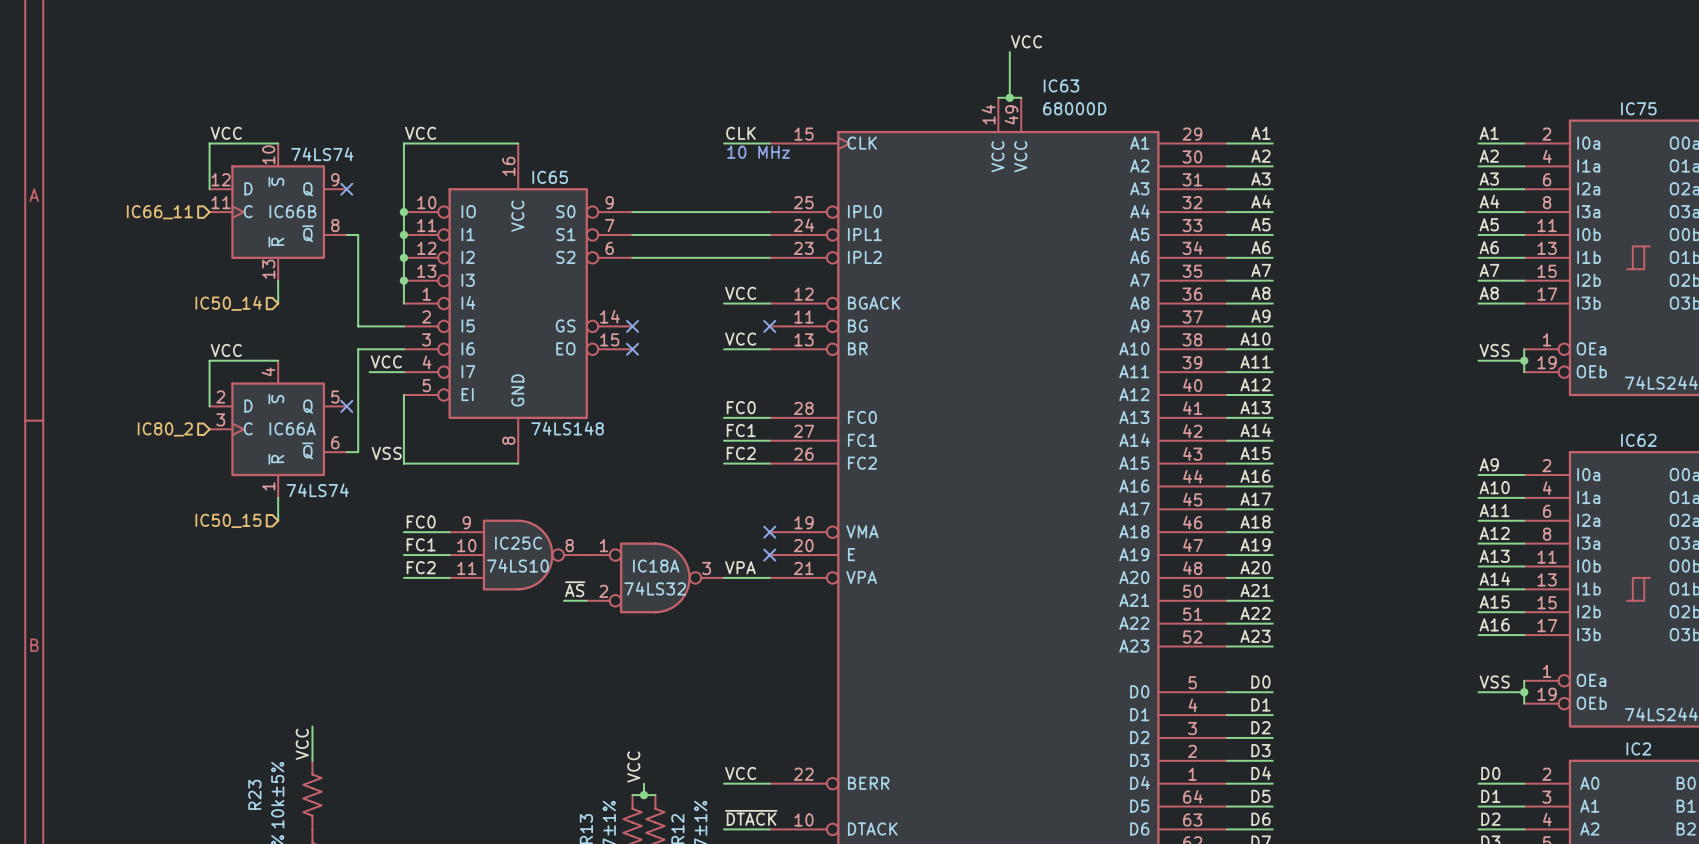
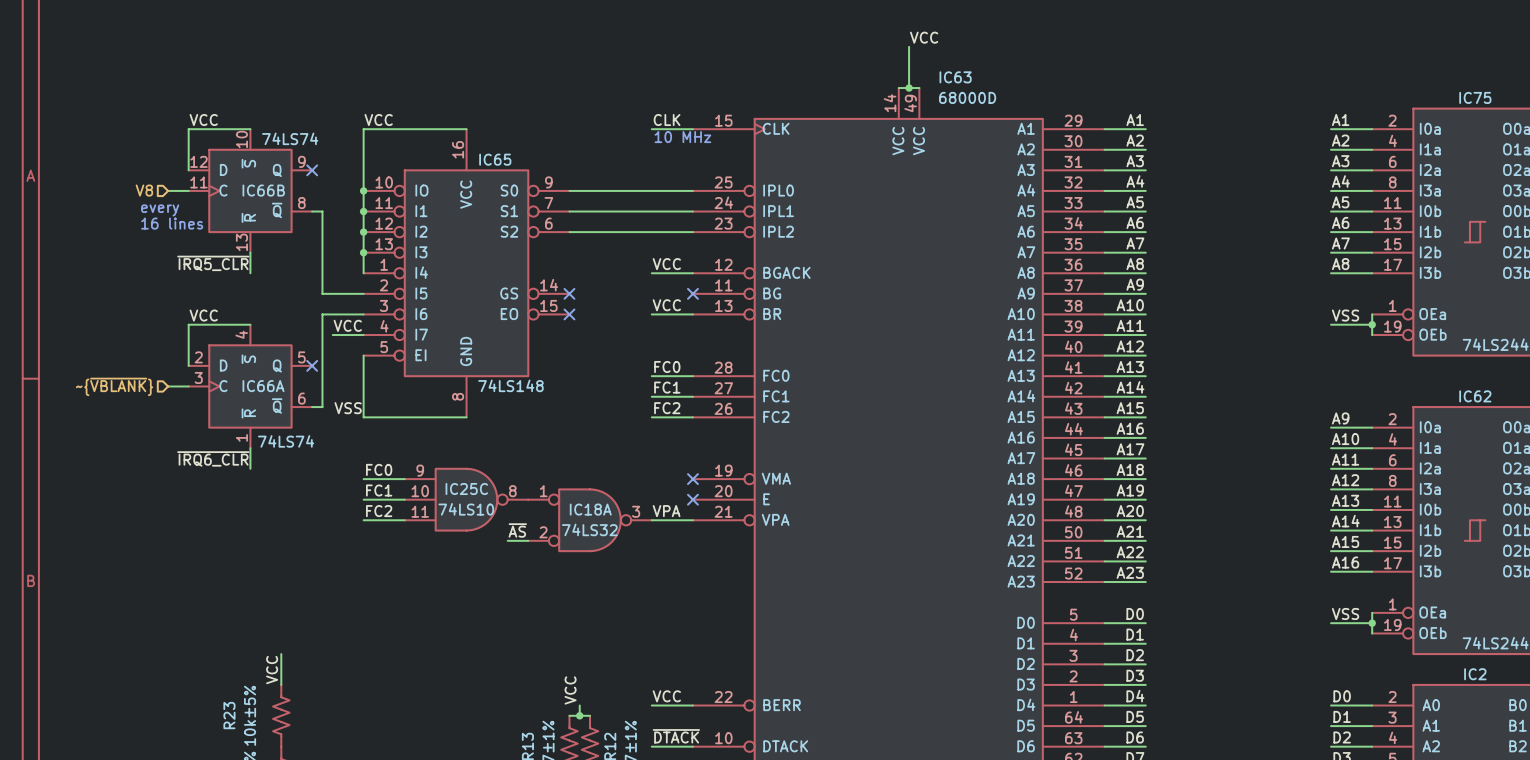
hierarchical label: none -> V8 (144, 190)
hierarchical label: IC66_11 (159, 212) -> none
wire: none -> (168, 190) (188, 190)
text: none -> every (160, 210)
text: none -> 16 lines (172, 223)
label: none -> ~{IRQ5_CLR} (213, 263)
hierarchical label: IC50_14 (228, 303) -> none
hierarchical label: none -> ~{~{VBLANK}} (114, 386)
hierarchical label: IC80_2 (165, 429) -> none
wire: none -> (168, 386) (188, 386)
label: none -> ~{IRQ6_CLR} (213, 458)
hierarchical label: IC50_15 (228, 520) -> none

